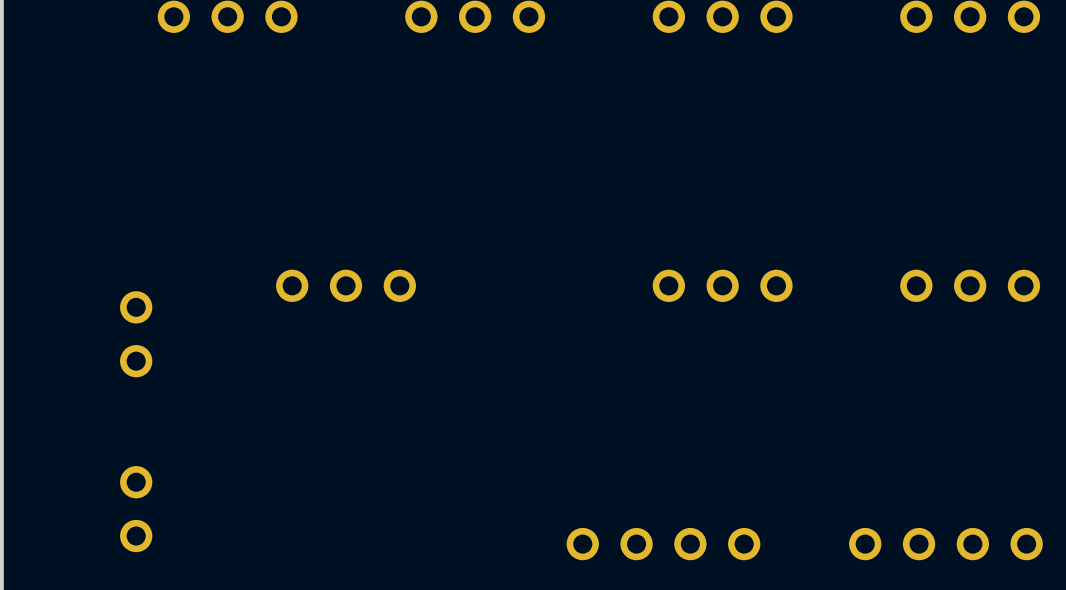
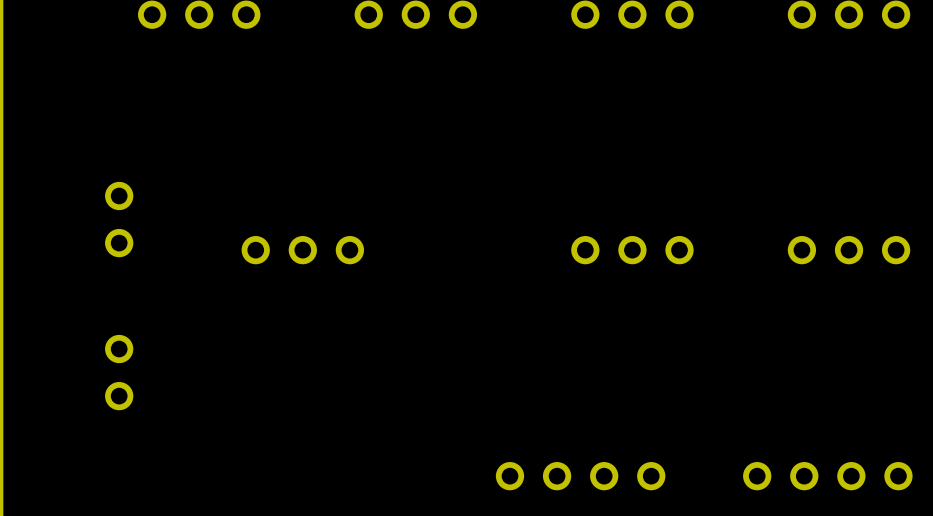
part: none -> (119, 219)
part: (136, 334) -> none
part: none -> (119, 372)
part: (136, 509) -> none

